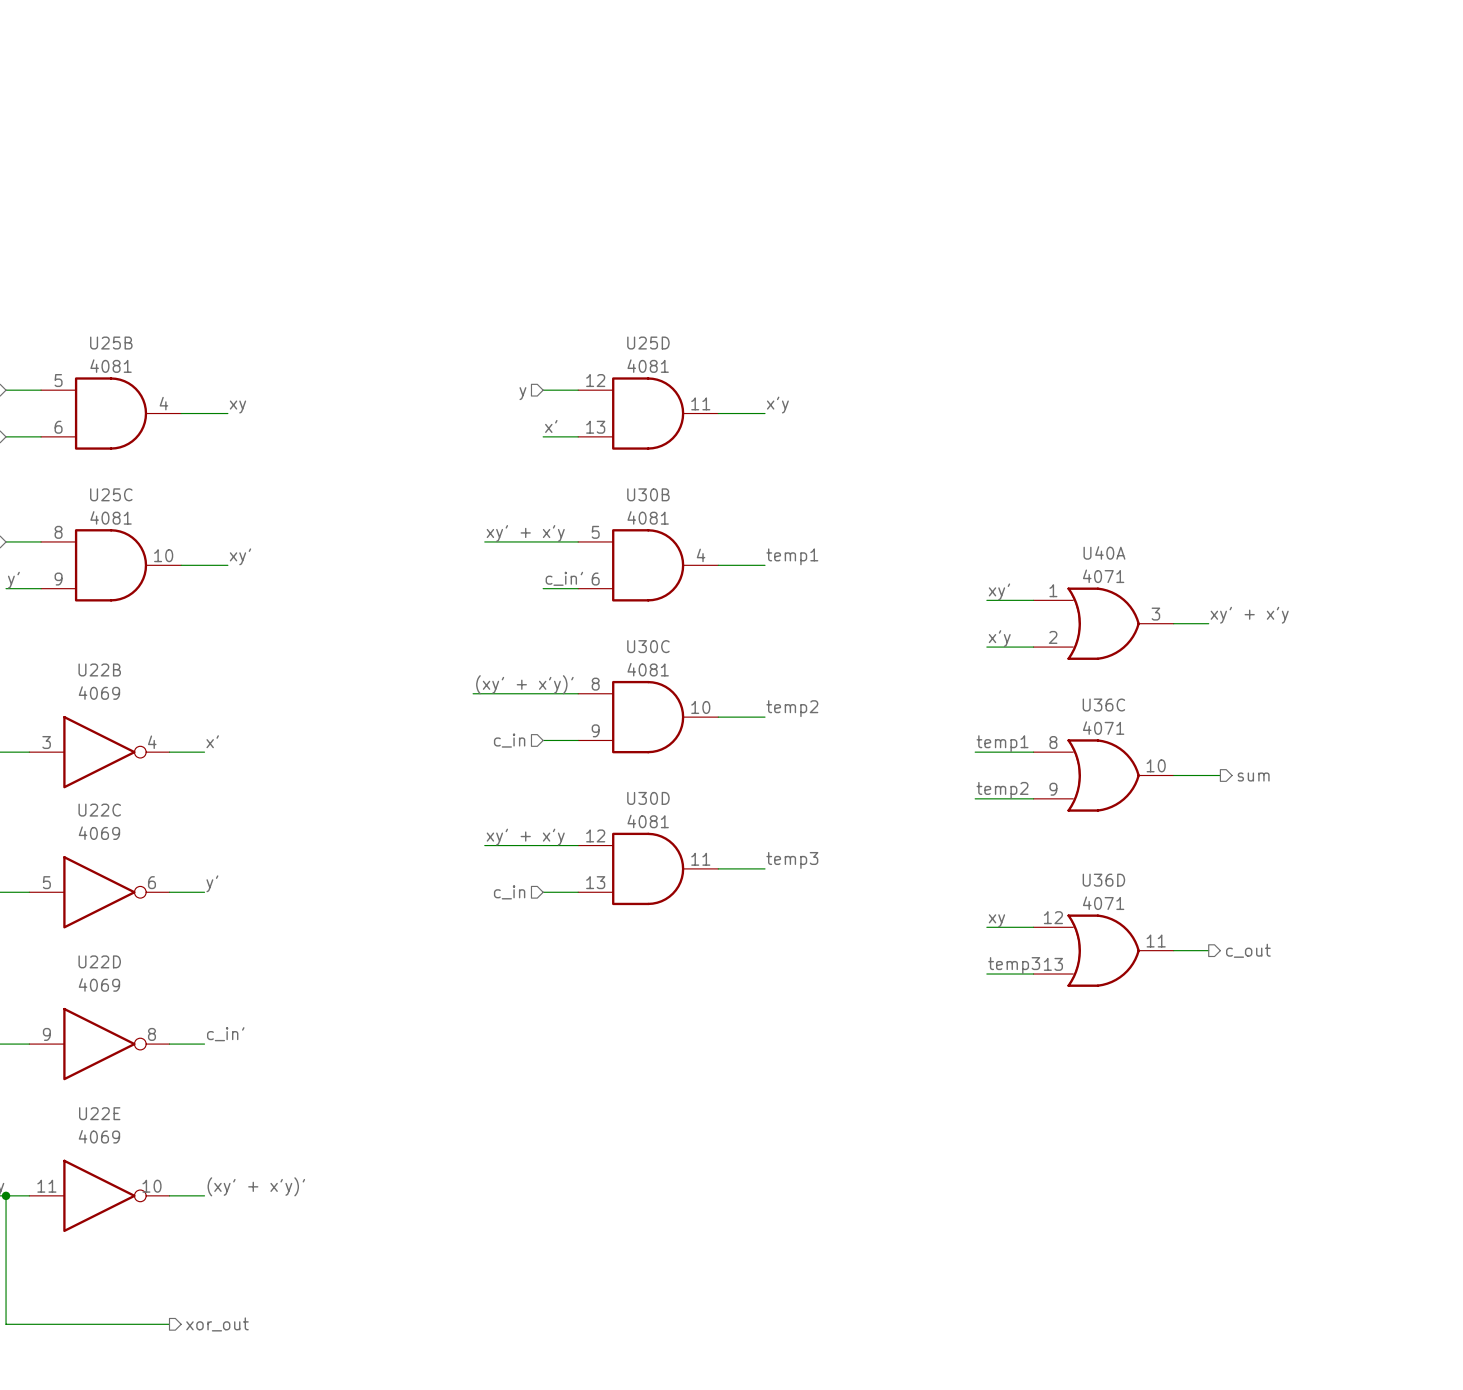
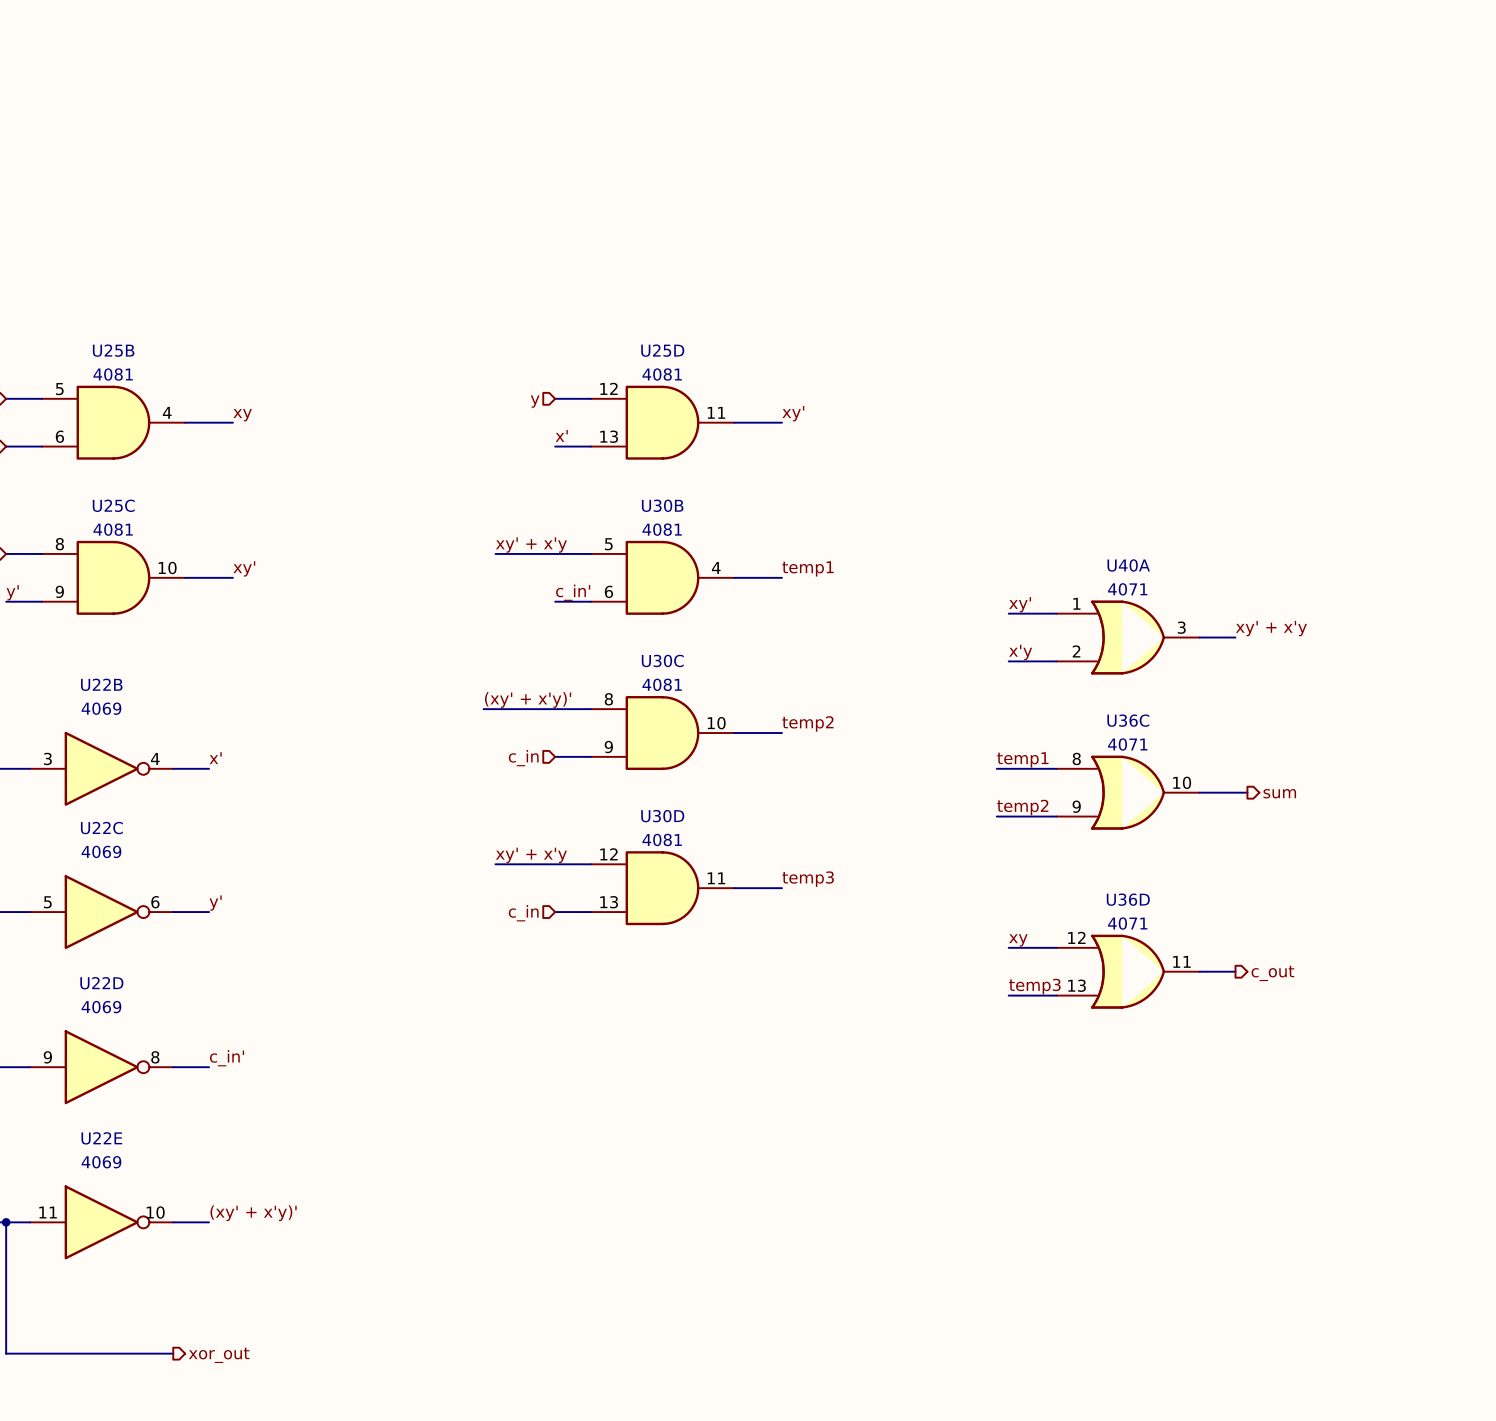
label: x'y (777, 405) -> xy' (793, 413)

